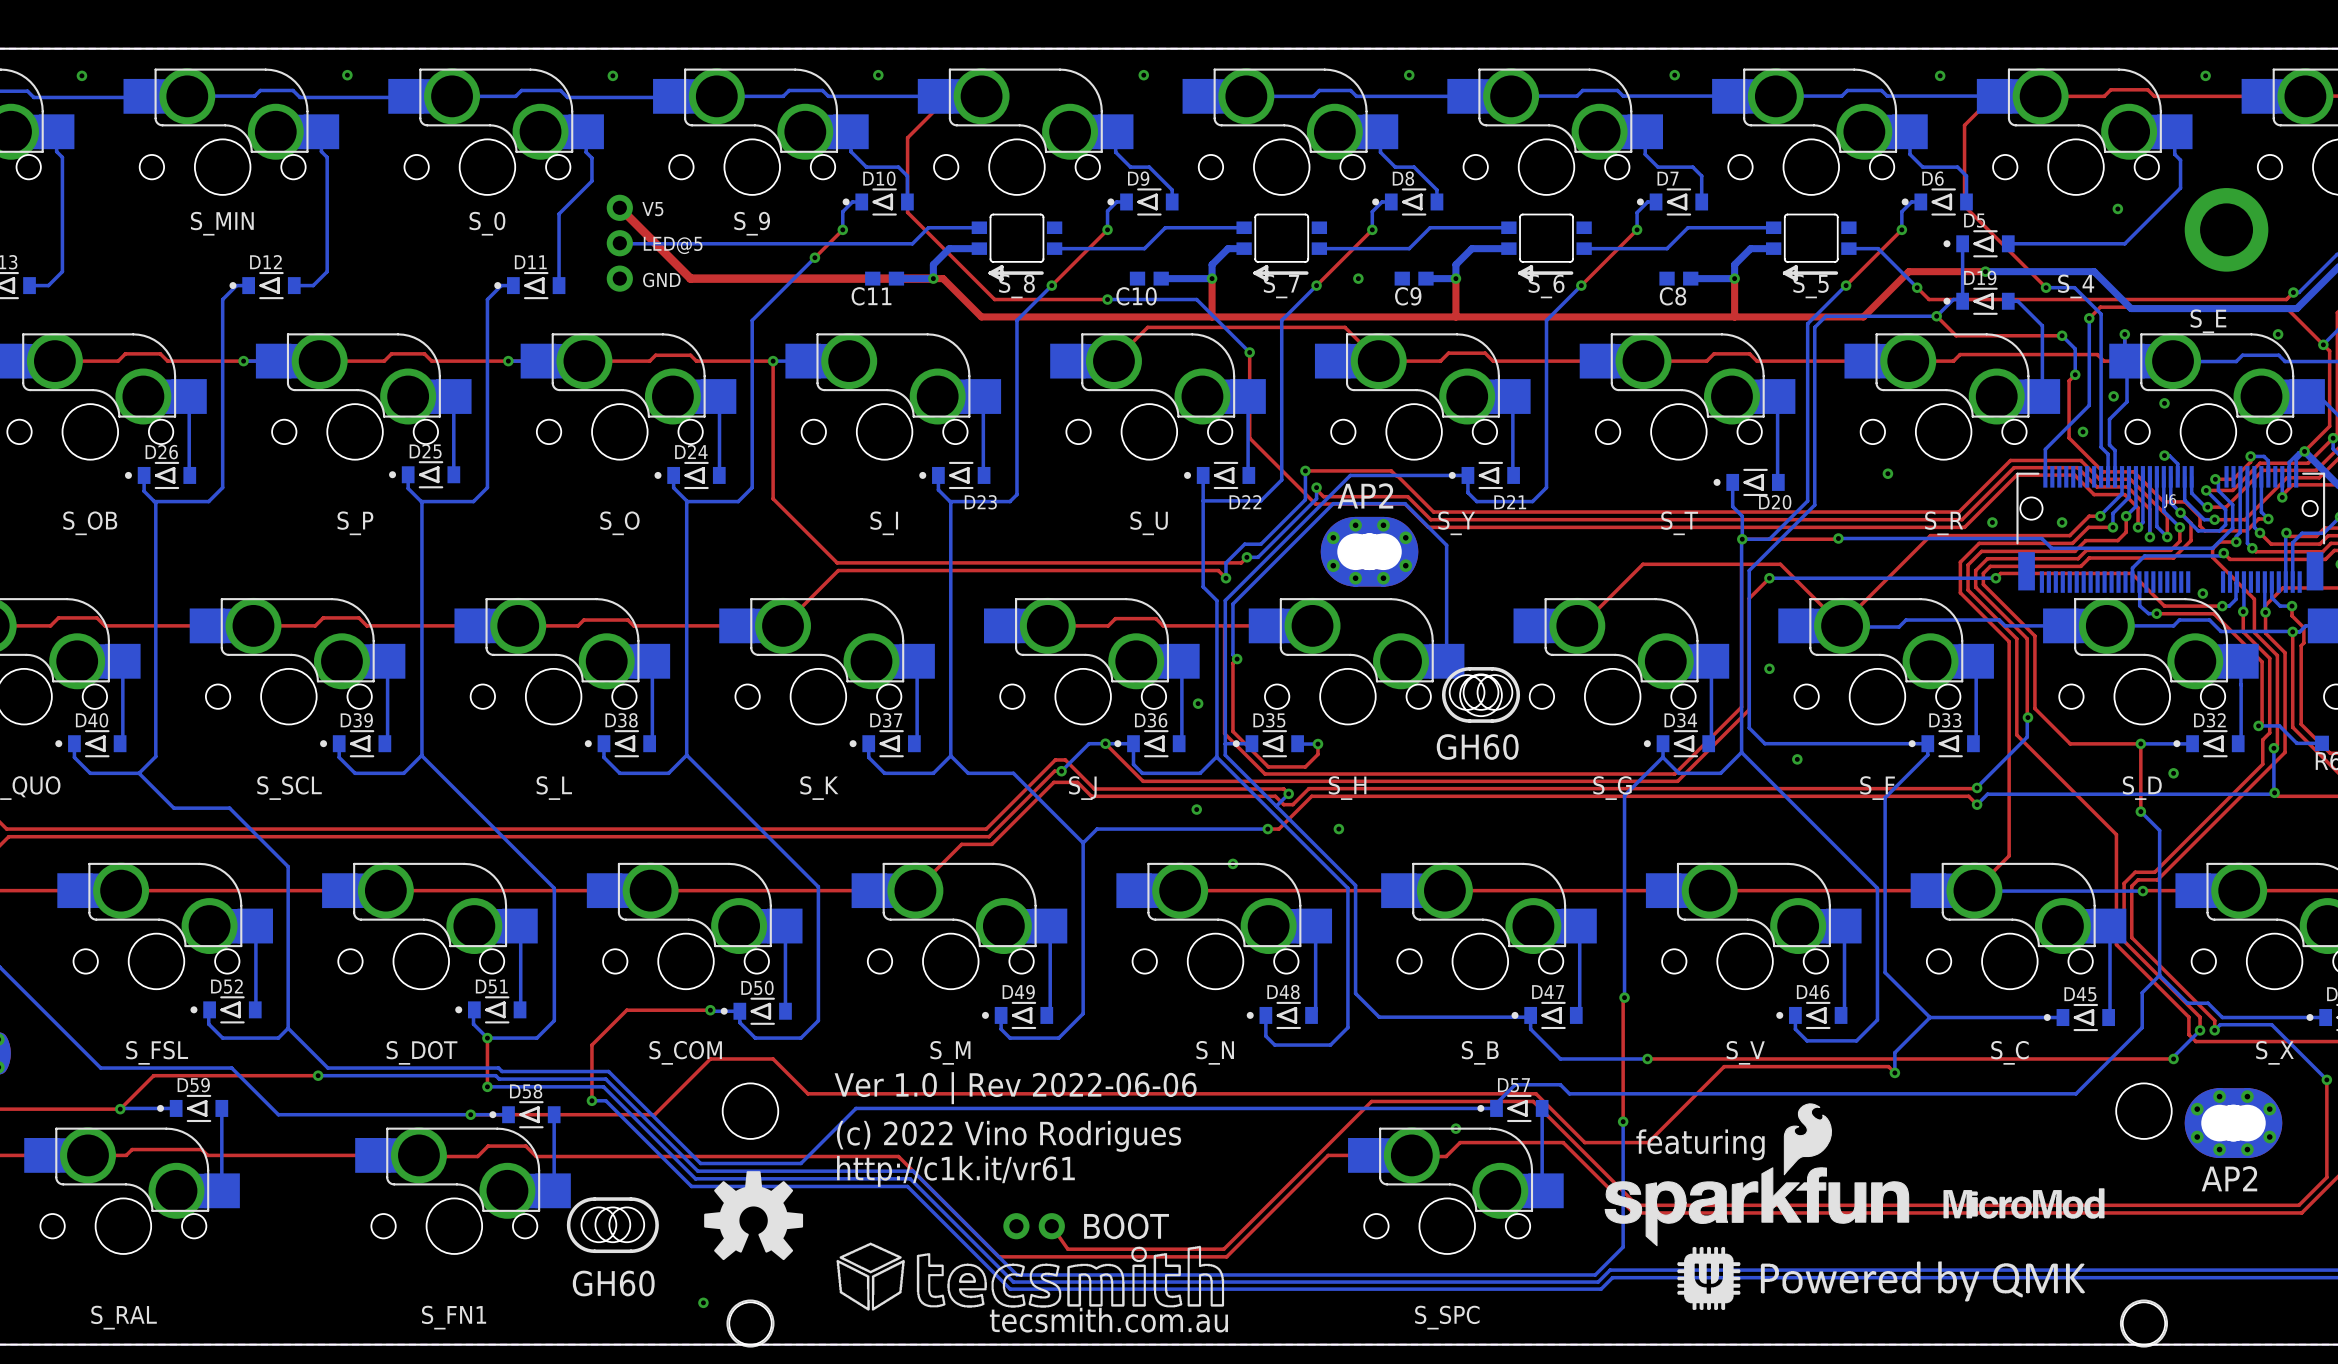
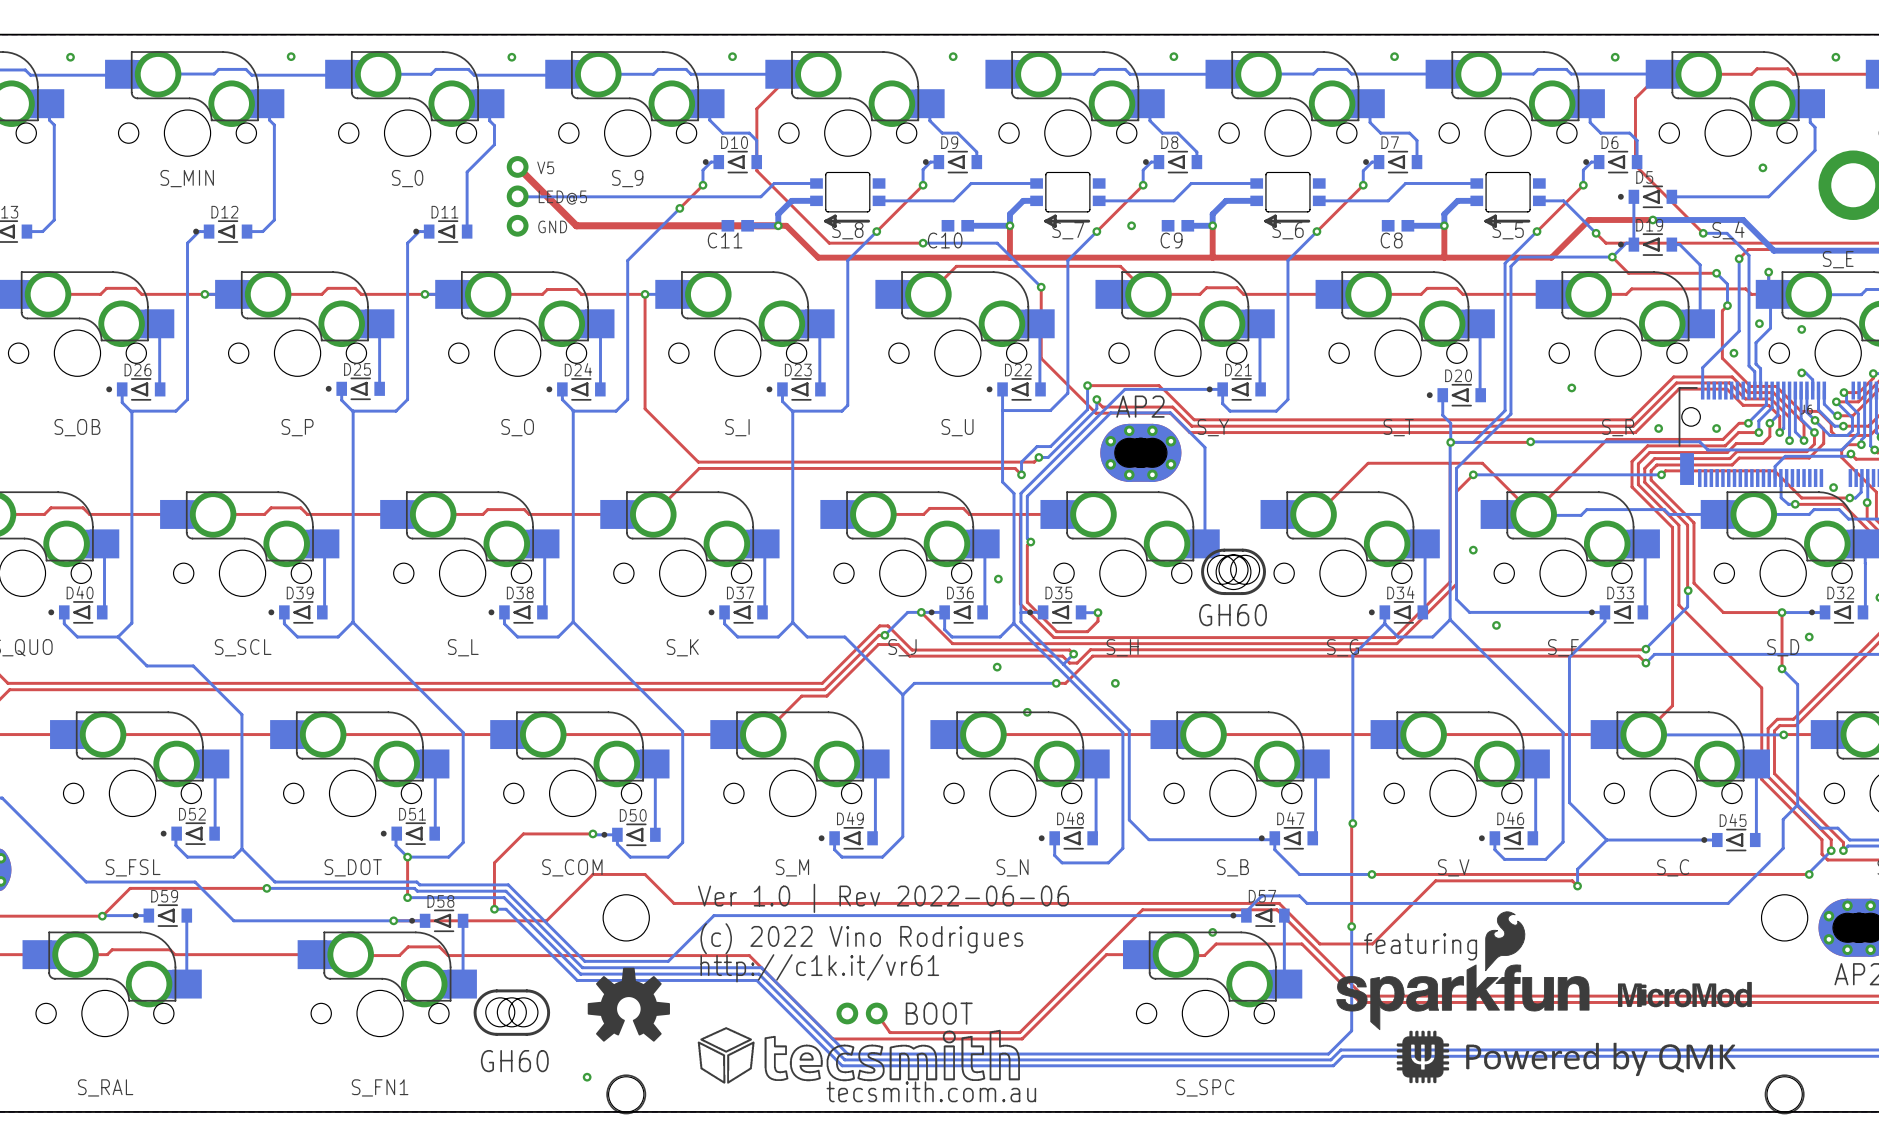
D23 name position: D23 (980, 502) -> D23 (798, 370)
D22 name position: D22 (1245, 502) -> D22 (1018, 370)
D21 name position: D21 (1510, 502) -> D21 (1238, 370)
D20 name position: D20 (1775, 502) -> D20 (1458, 375)

